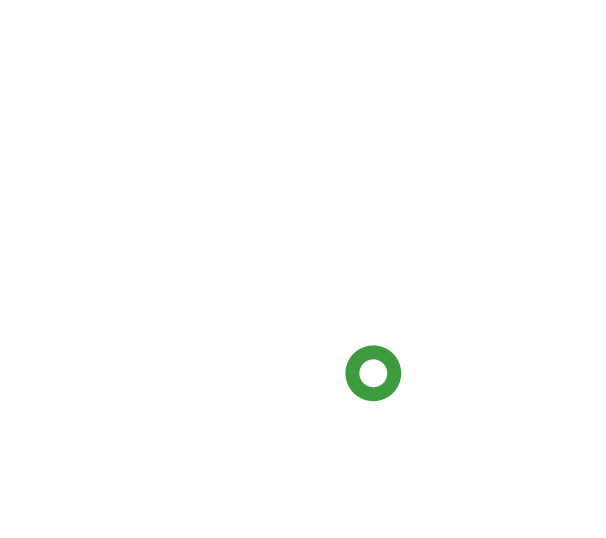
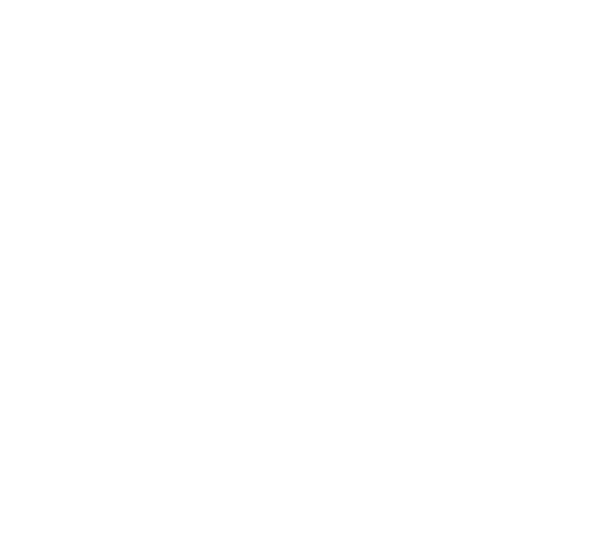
via: (373, 373) -> none

